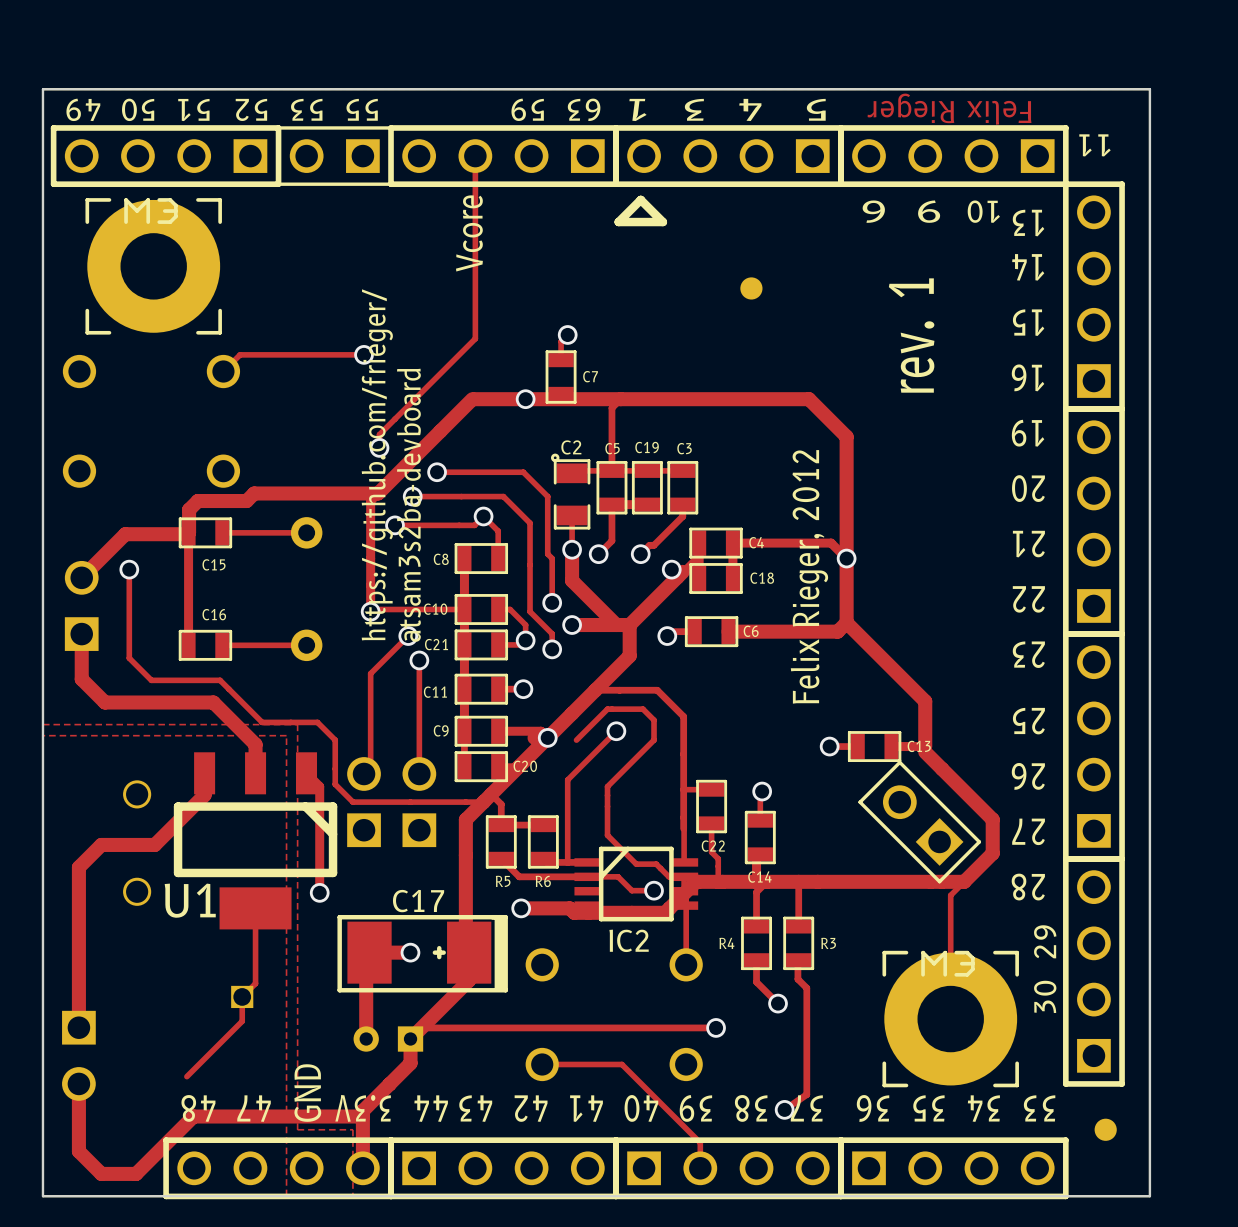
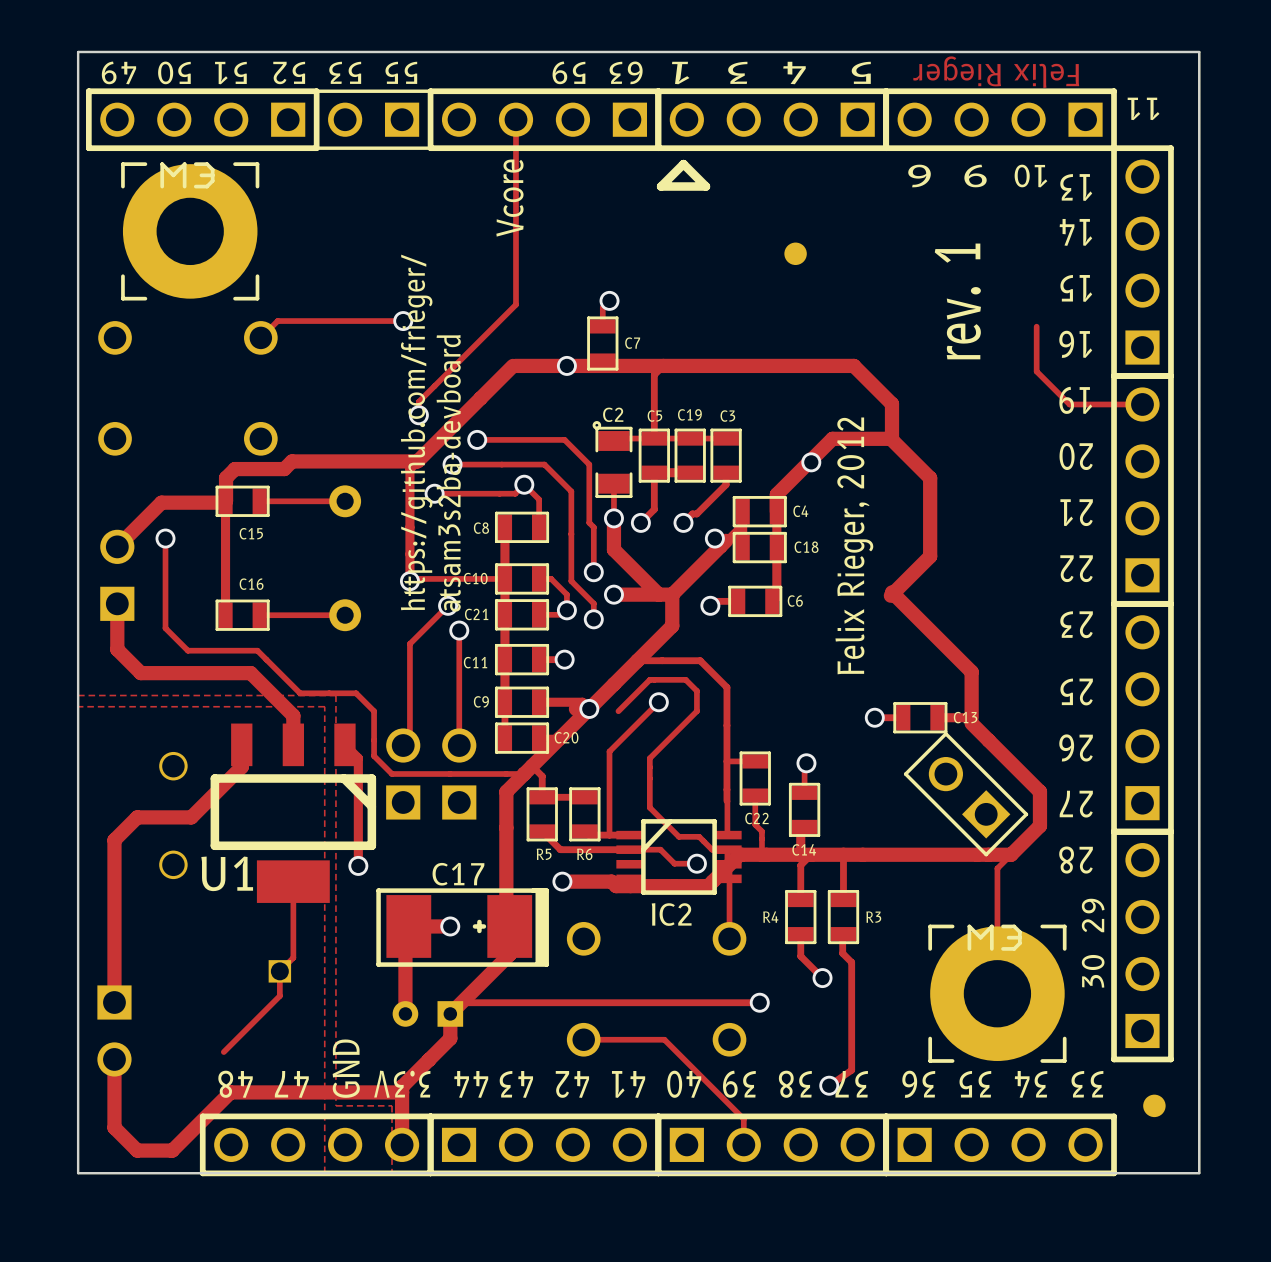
track: none -> (1036, 326) (1036, 371) (1069, 404) (1142, 404)
track: (846, 470) (846, 622) (837, 631) (728, 631) -> (776, 547) (776, 596) (772, 601)
track: (732, 543) (831, 543) (846, 558) -> (776, 511) (776, 494) (832, 438) (890, 438) (930, 478) (930, 556) (890, 595)
via position: (846, 558) -> (811, 462)

